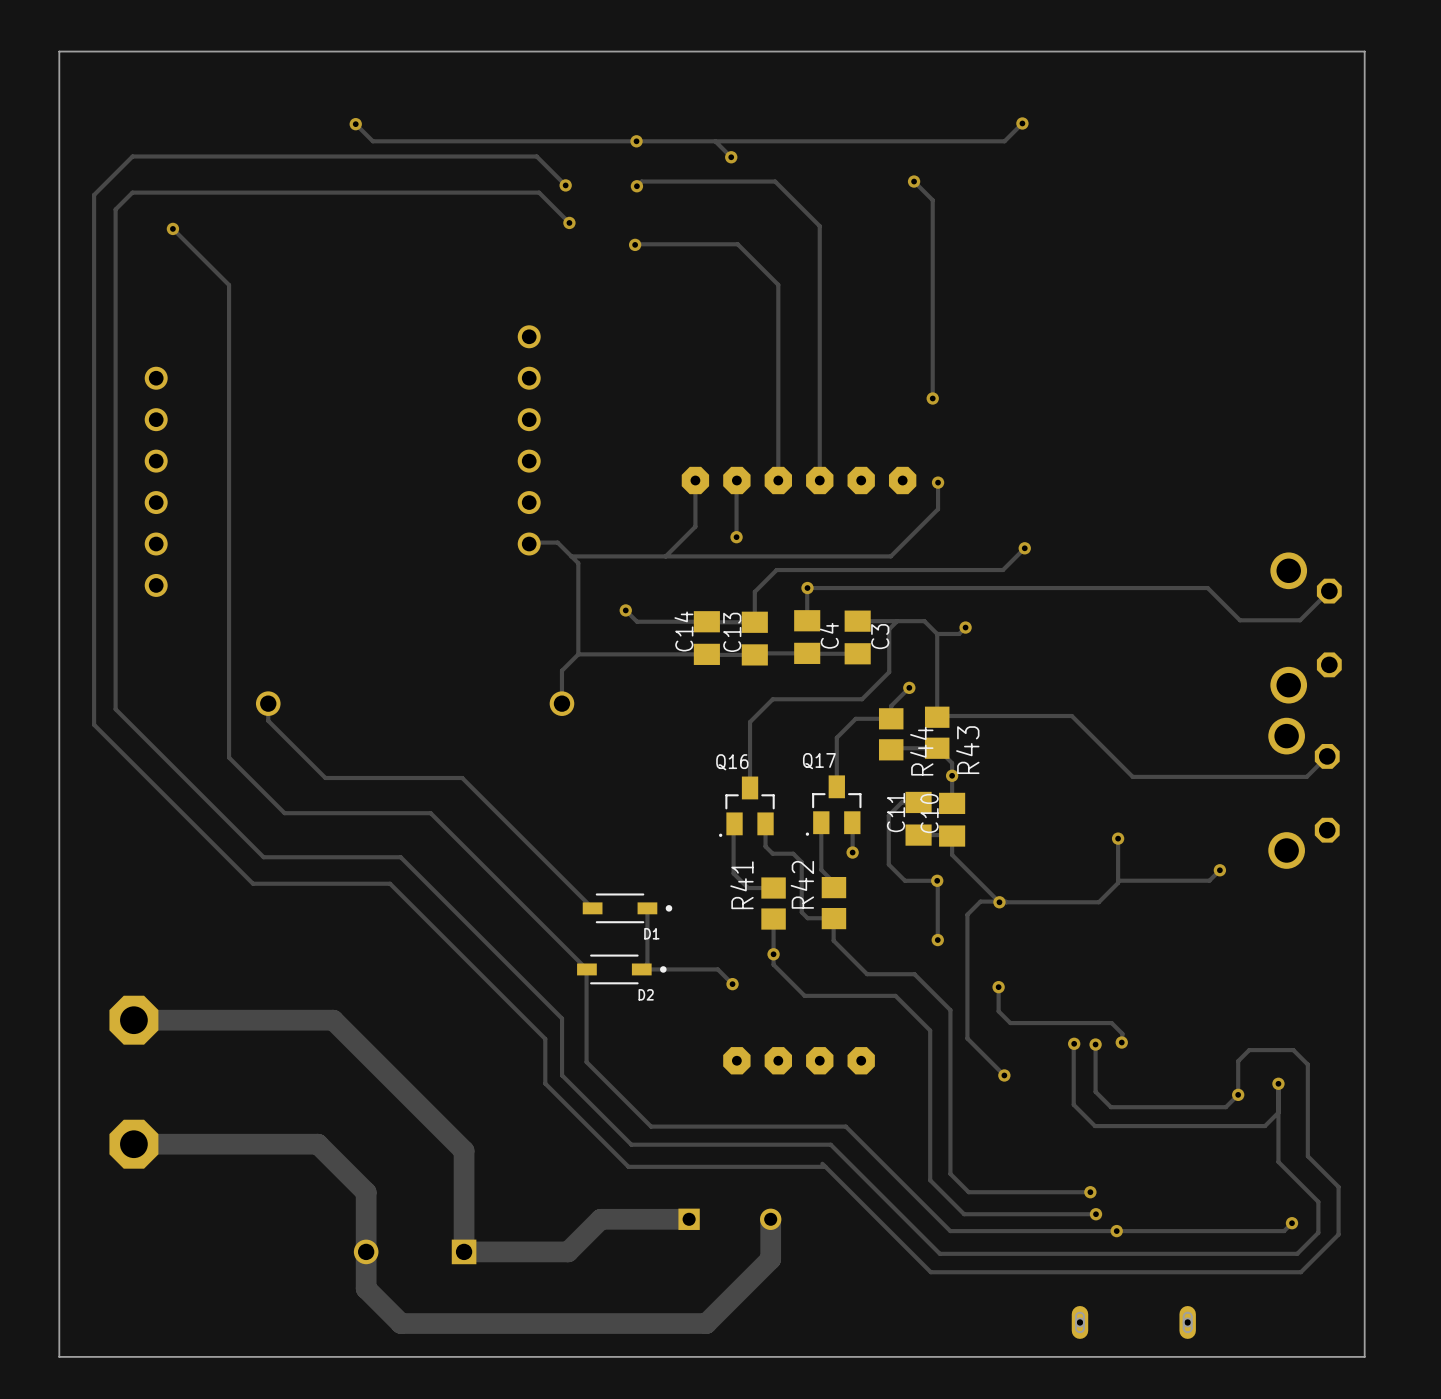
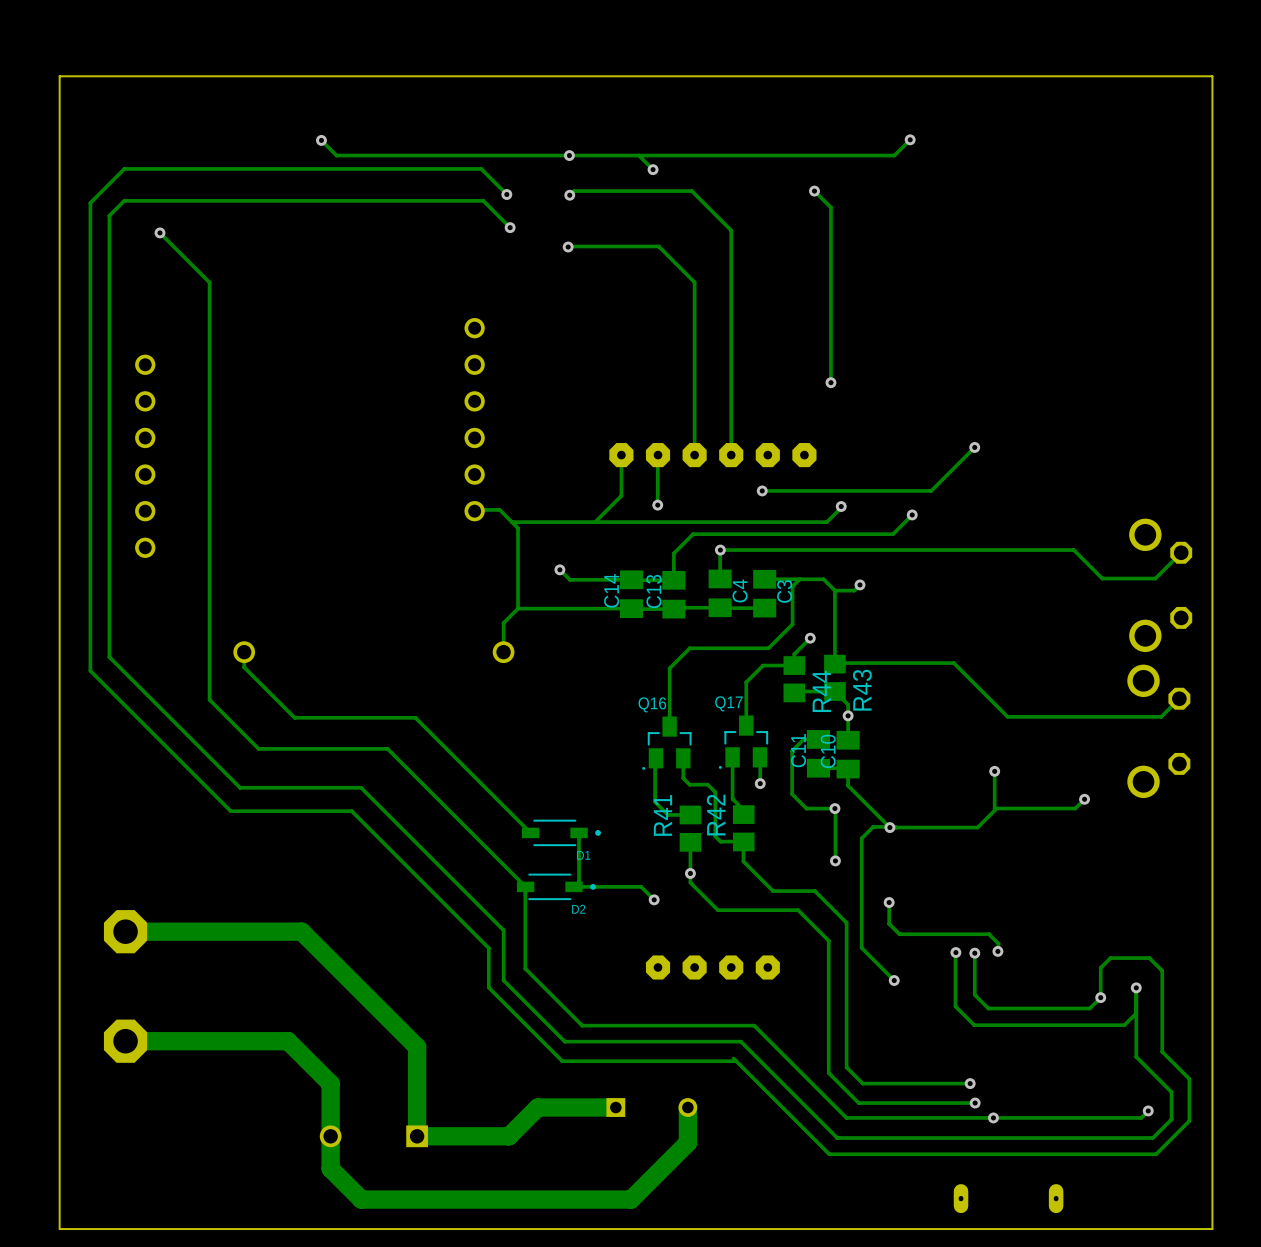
track: none -> (974, 447) (931, 490) (762, 490)
via: none -> (974, 447)
track: (938, 482) (938, 509) (890, 556) -> (841, 506) (826, 522) (793, 522)
via: (938, 482) -> none
via: none -> (762, 490)
via: none -> (841, 506)

